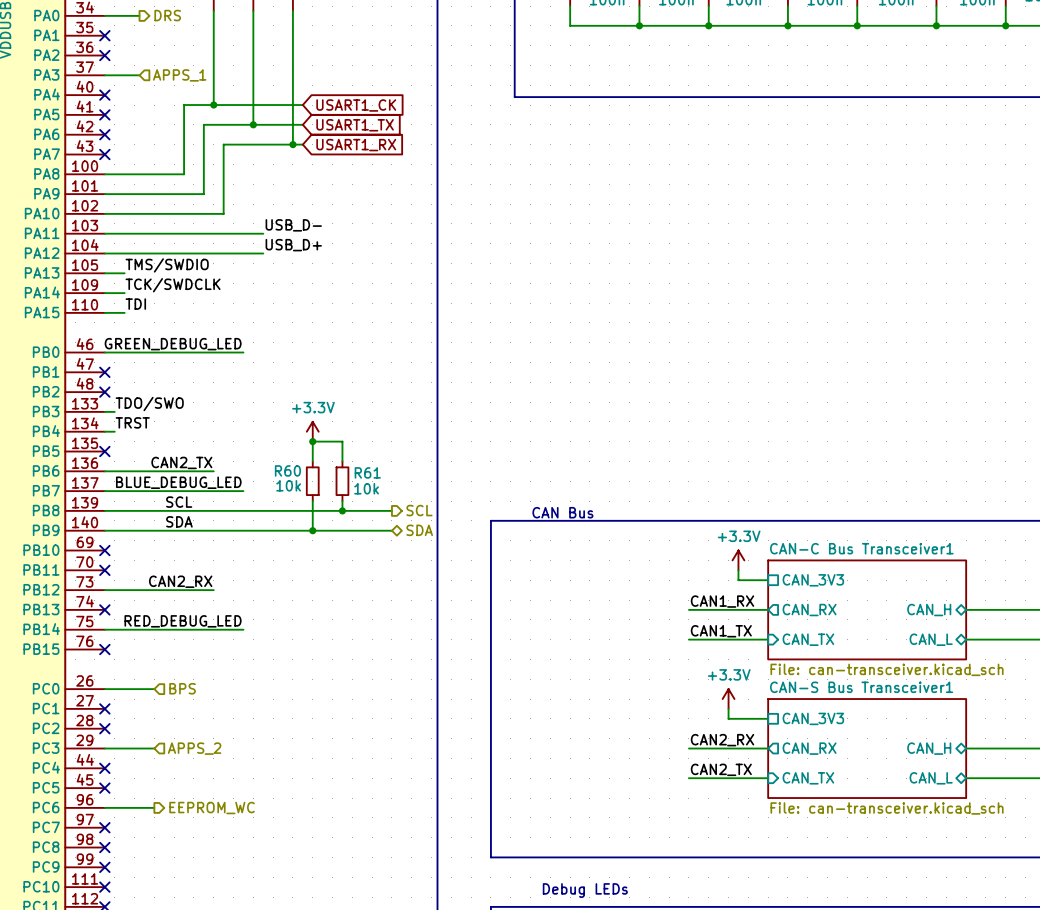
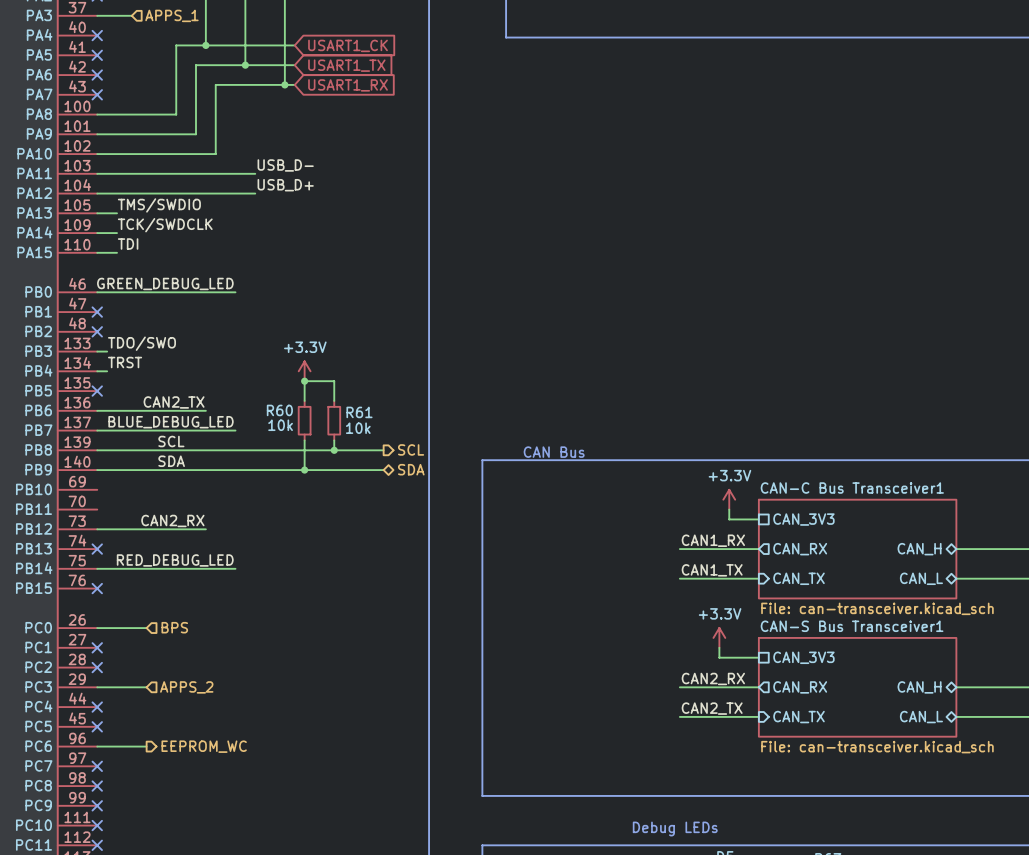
no-connect mark: (104, 550) -> none
no-connect mark: (104, 570) -> none
text position: Debug LEDs (585, 890) -> Debug LEDs (675, 829)

